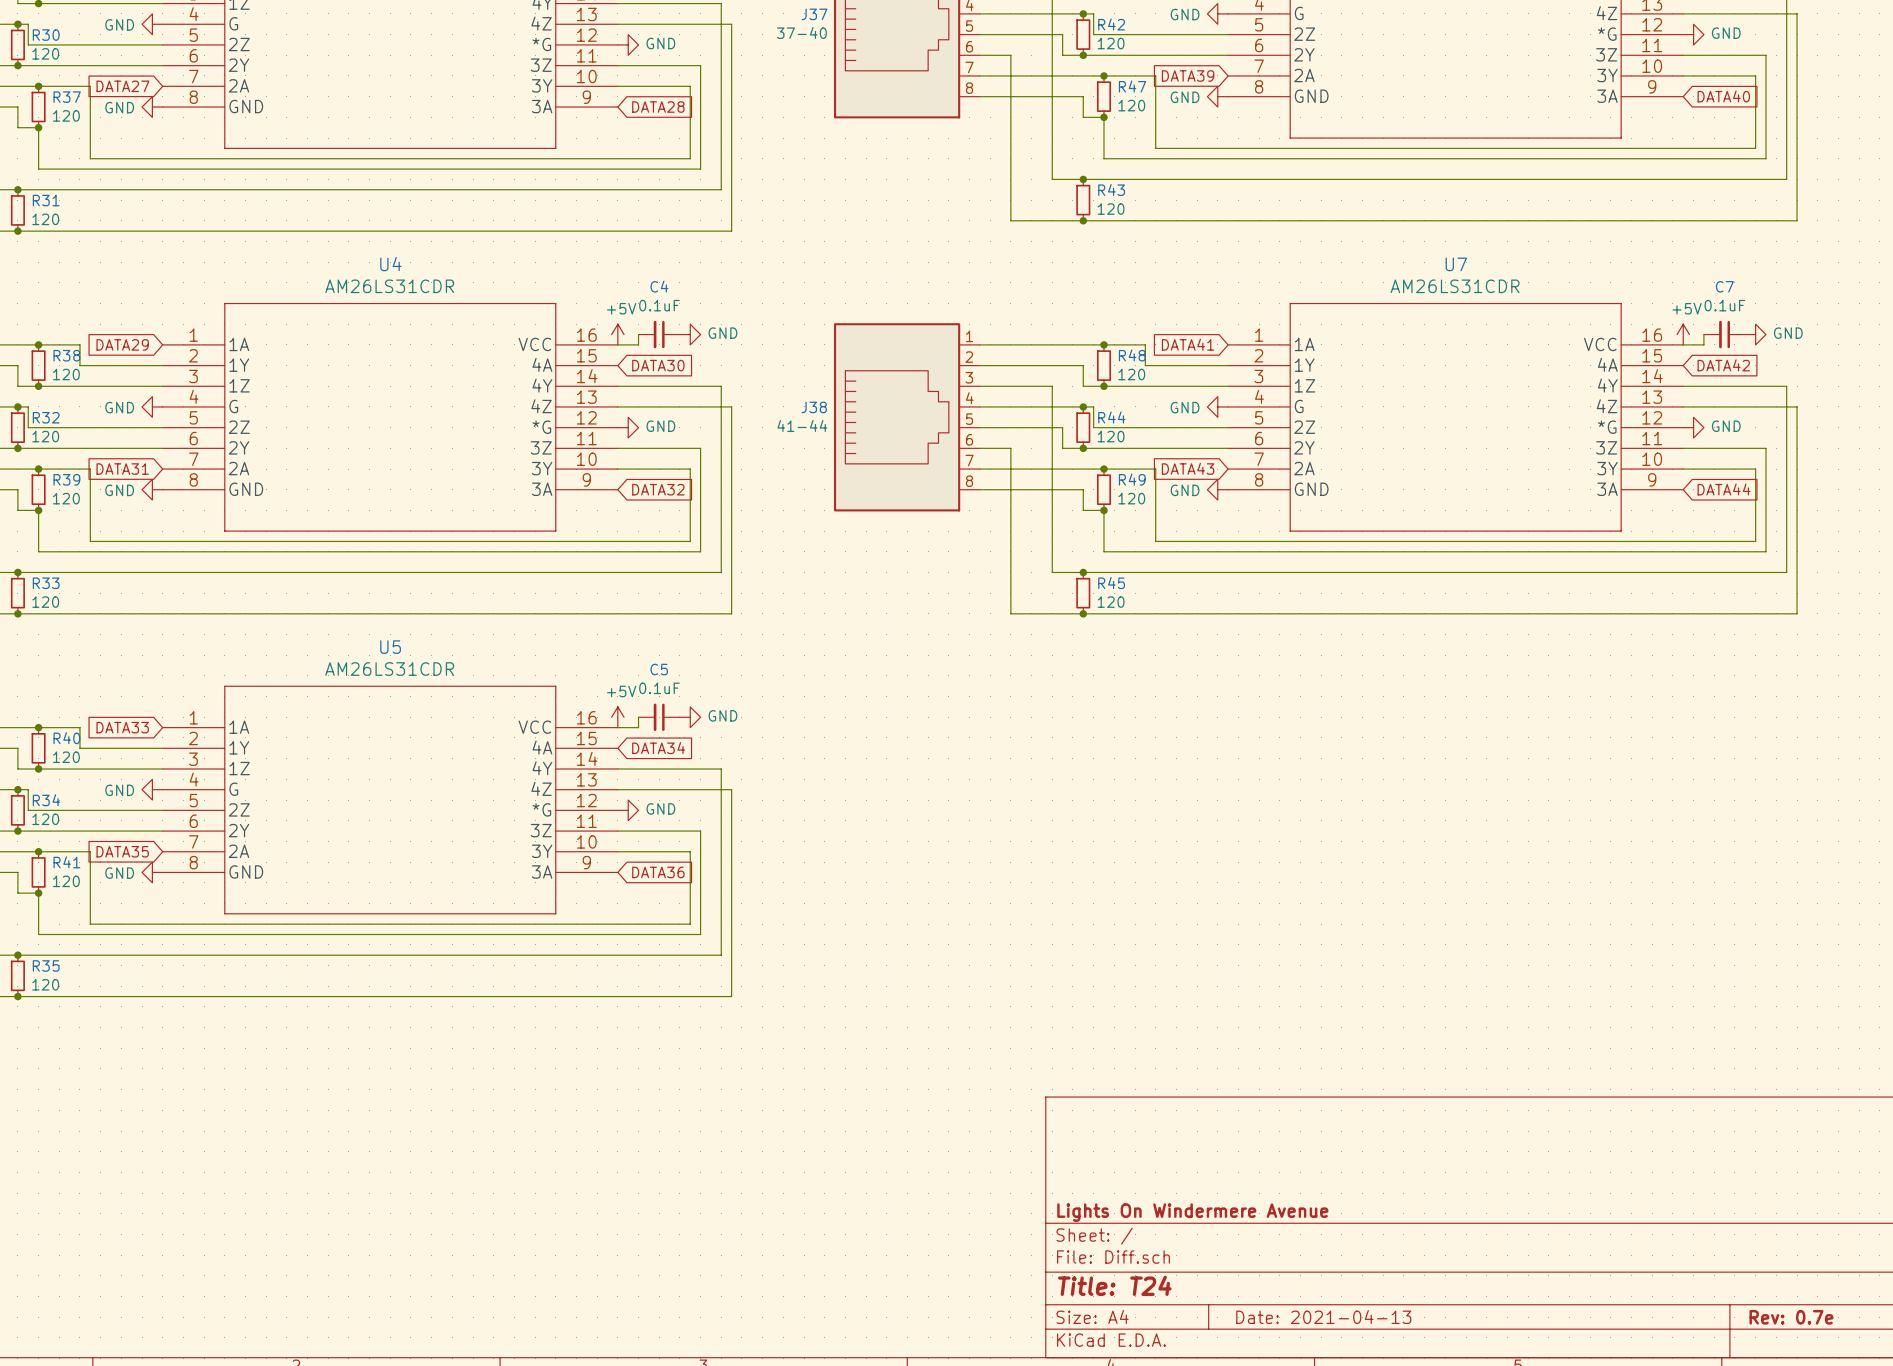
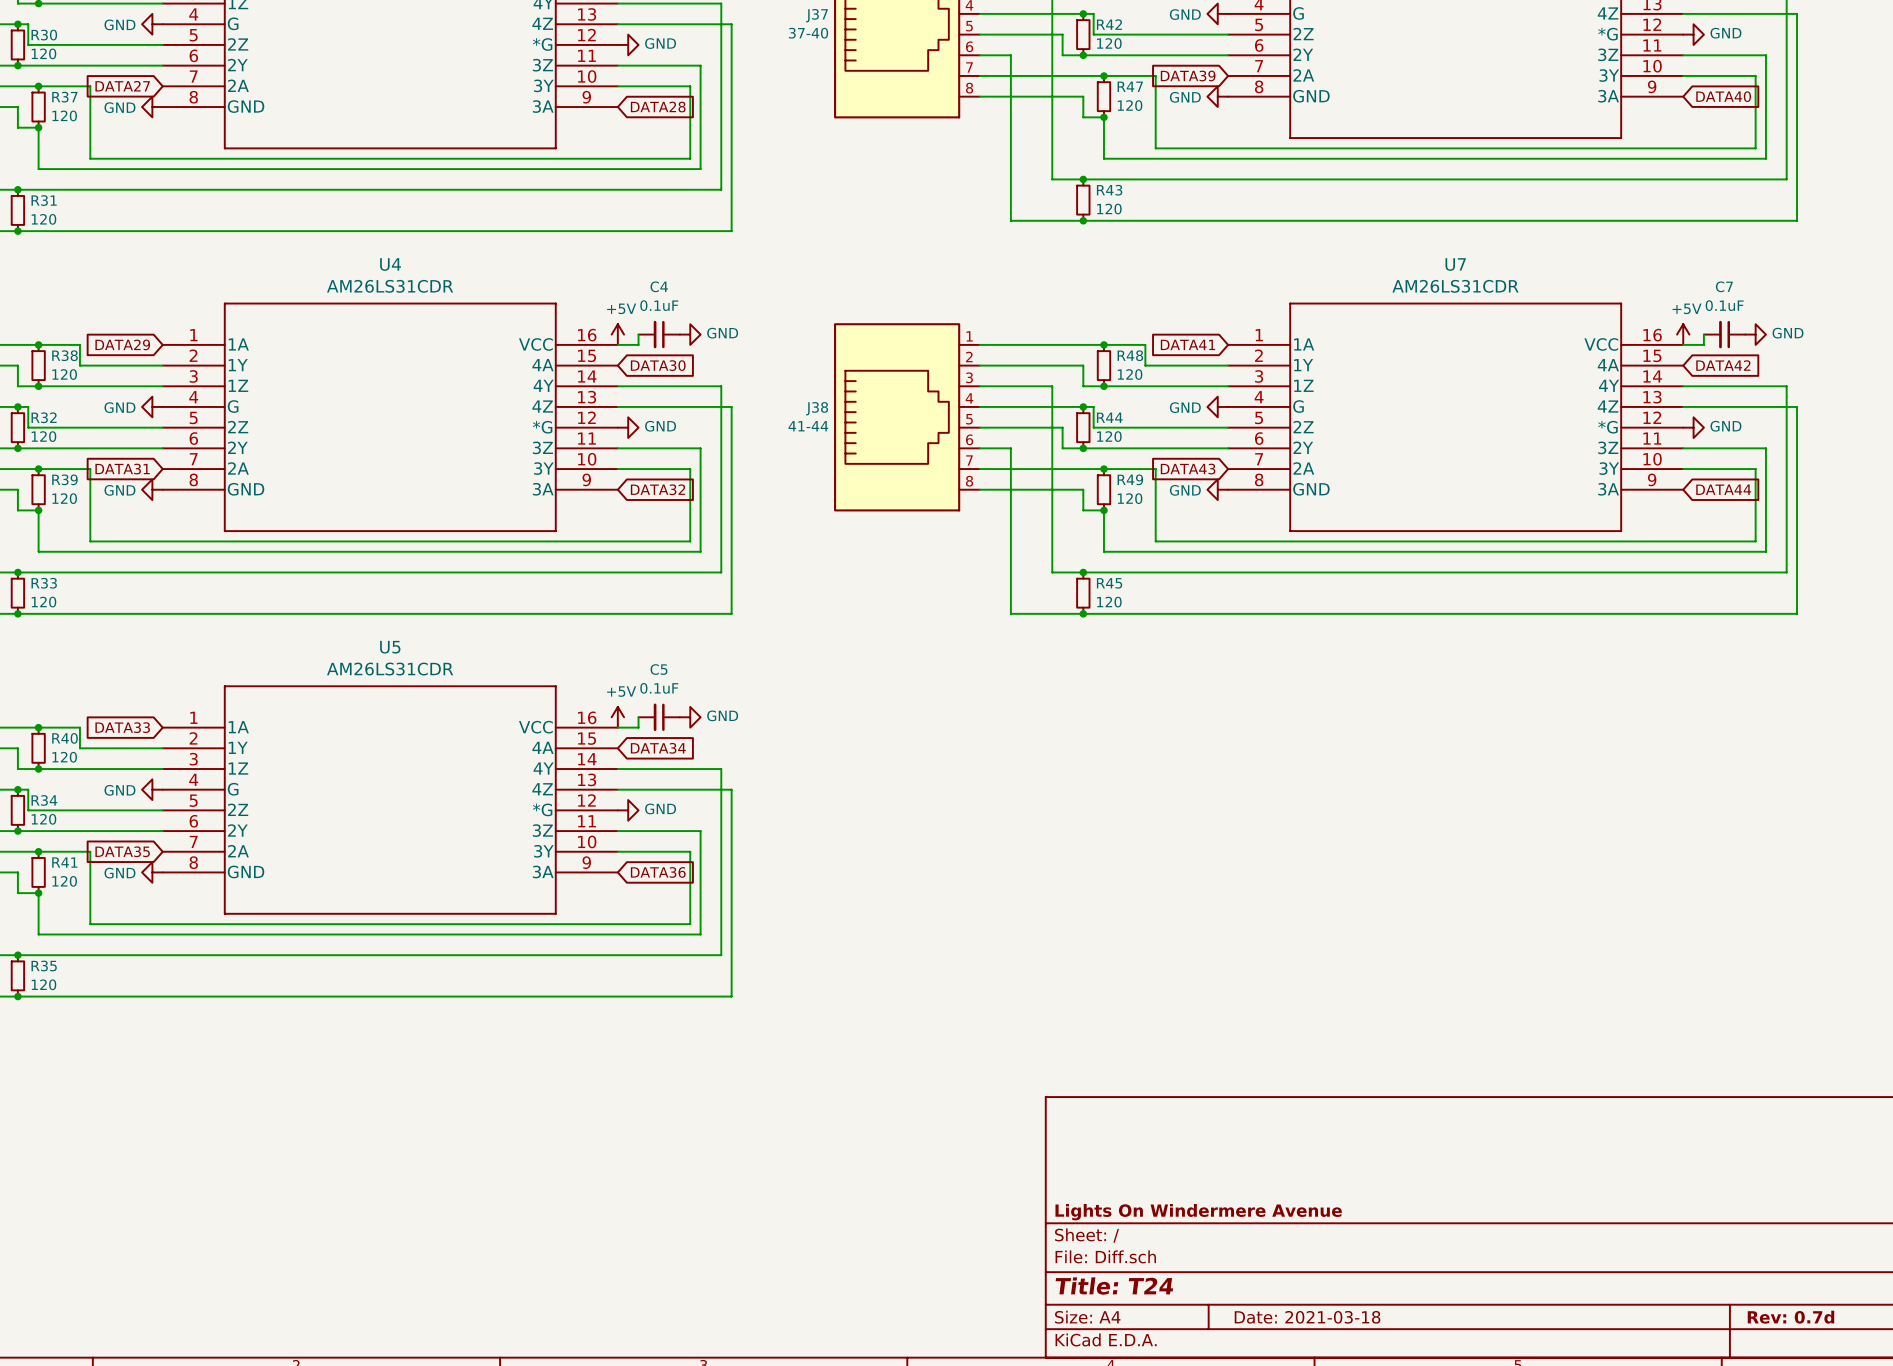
title block: Date: 2021-04-13 (1323, 1317) -> Date: 2021-03-18 (1307, 1317)
title block: Rev: 0.7e (1791, 1317) -> Rev: 0.7d (1790, 1317)

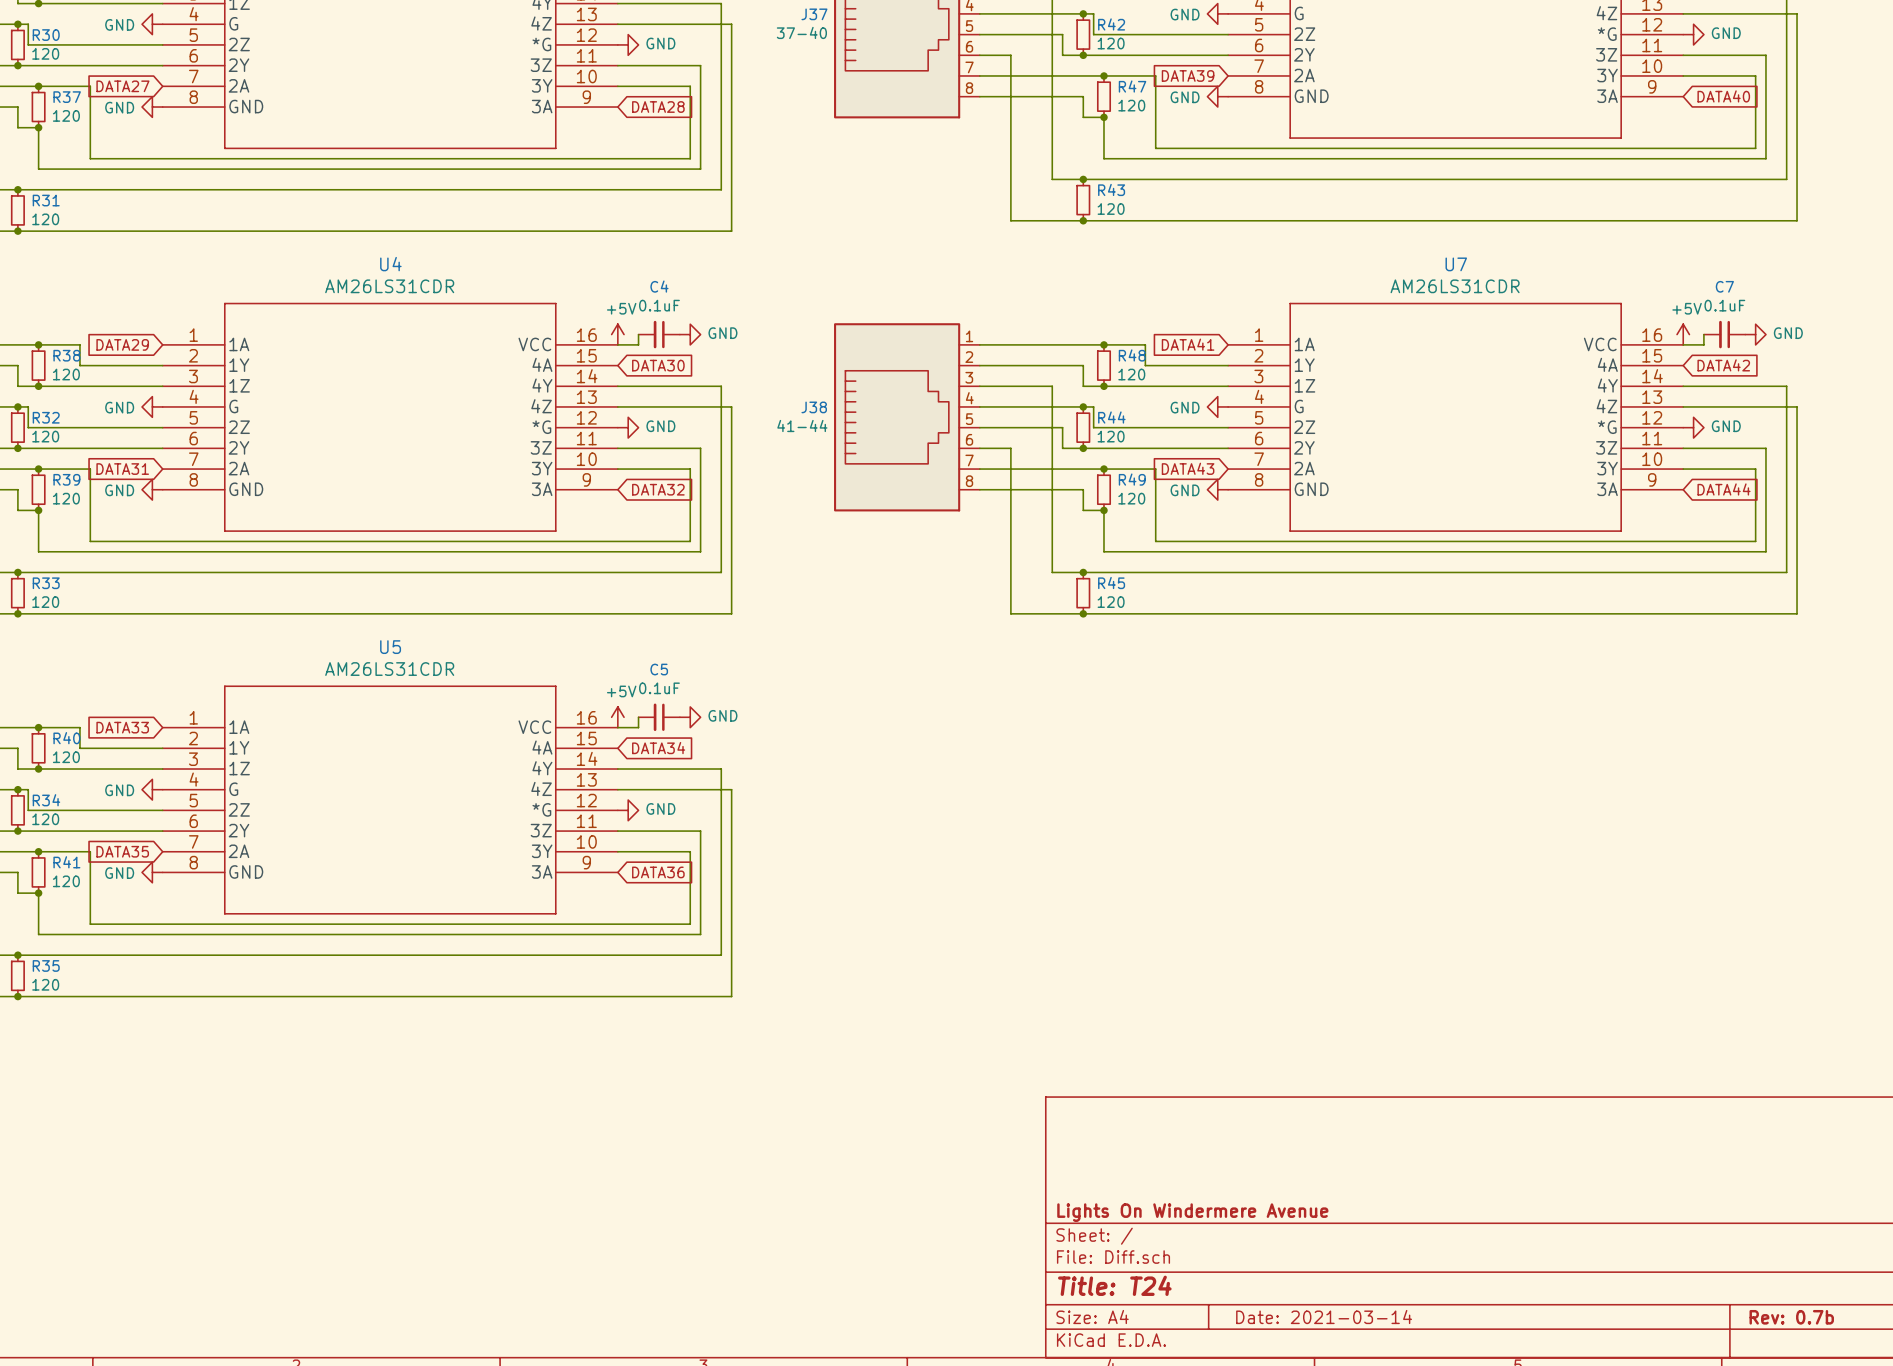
title block: Date: 2021-03-18 (1307, 1317) -> Date: 2021-03-14 (1324, 1317)
title block: Rev: 0.7d (1790, 1317) -> Rev: 0.7b (1791, 1317)

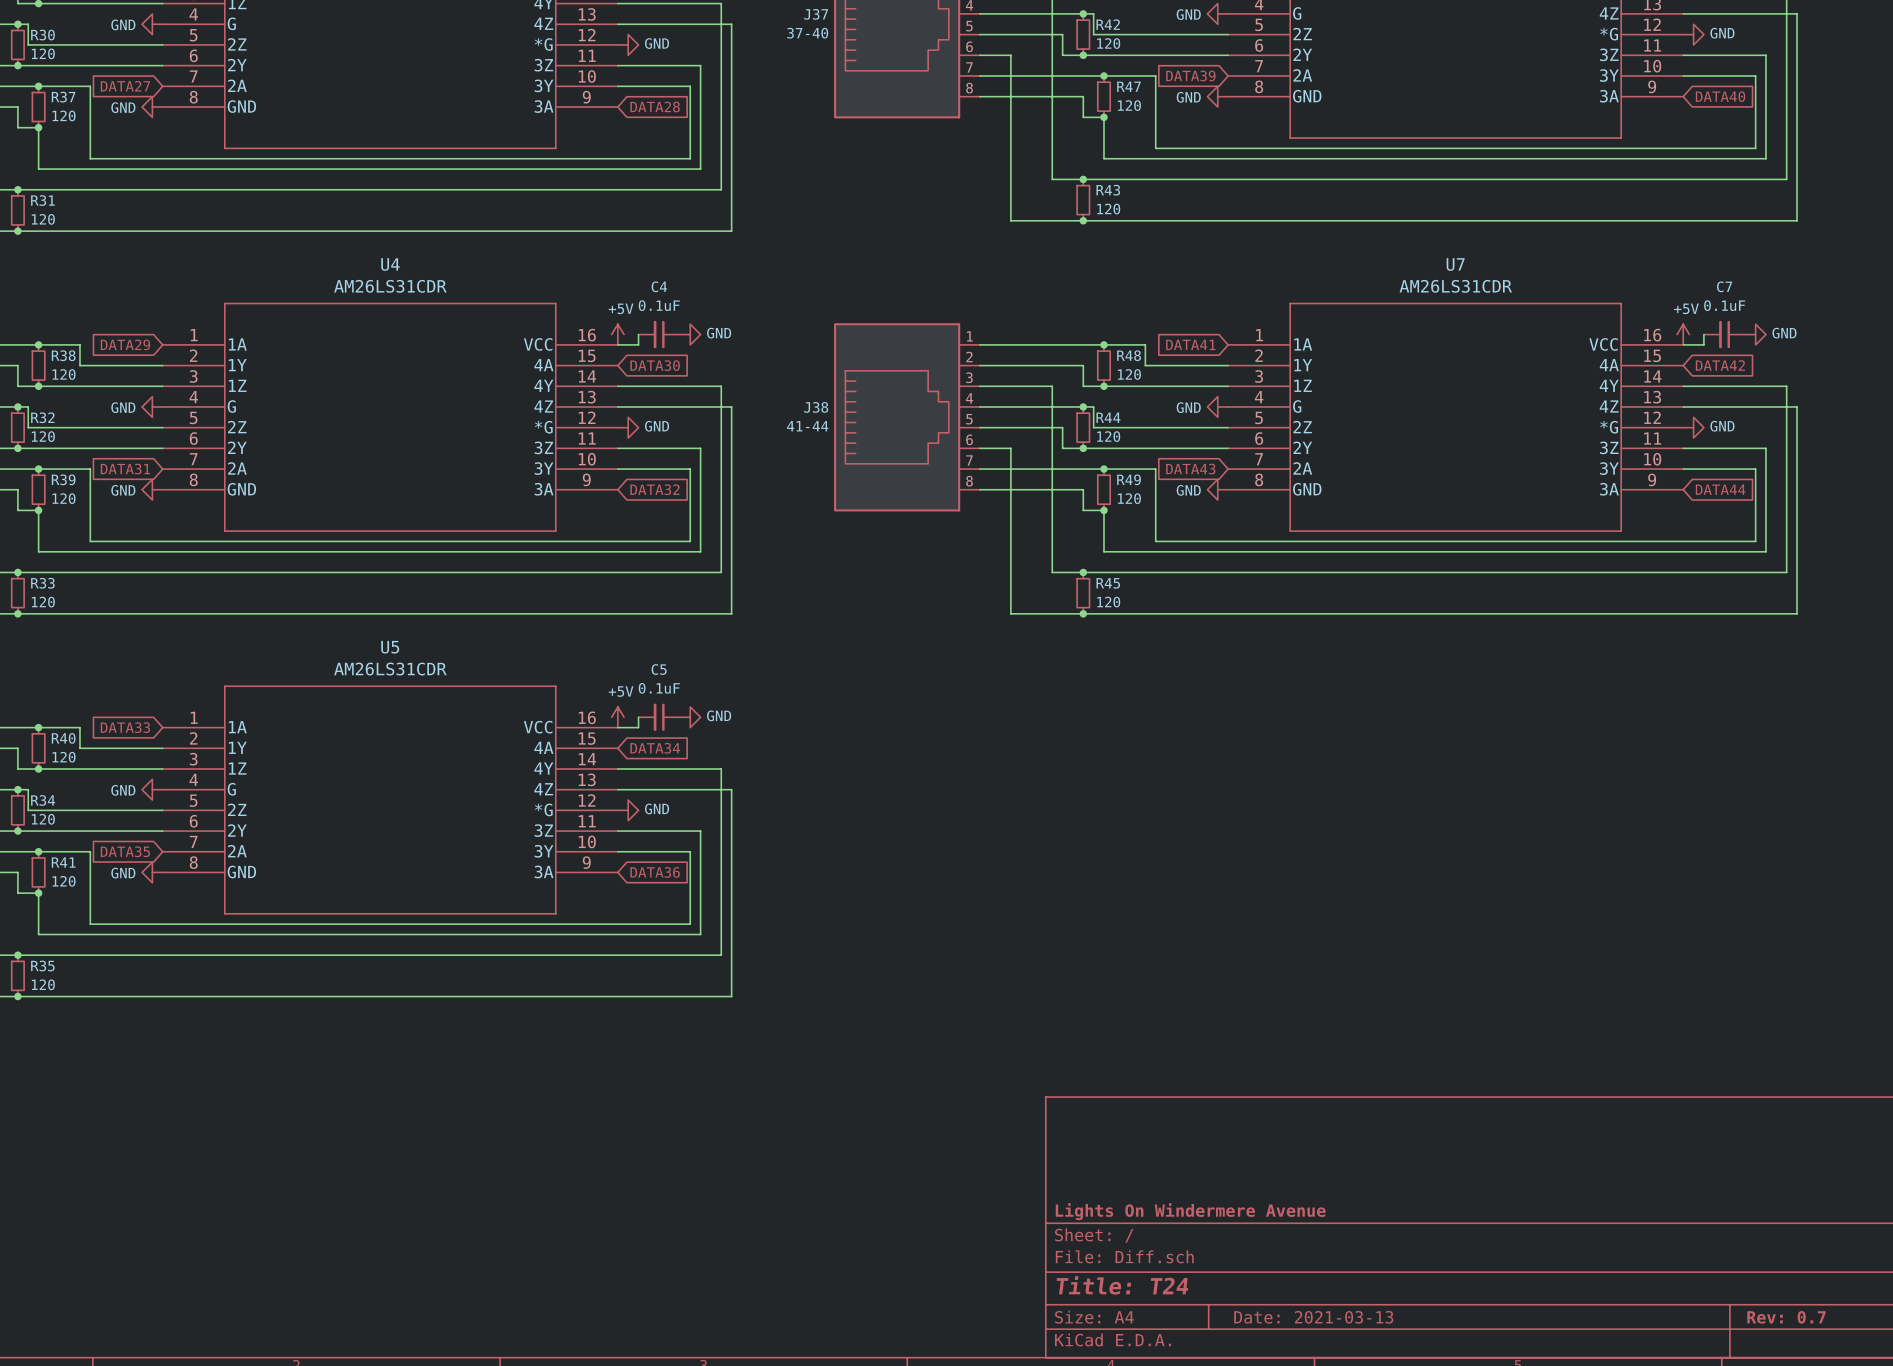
title block: Date: 2021-03-14 (1324, 1317) -> Date: 2021-03-13 (1313, 1317)
title block: Rev: 0.7b (1791, 1317) -> Rev: 0.7 (1786, 1317)

